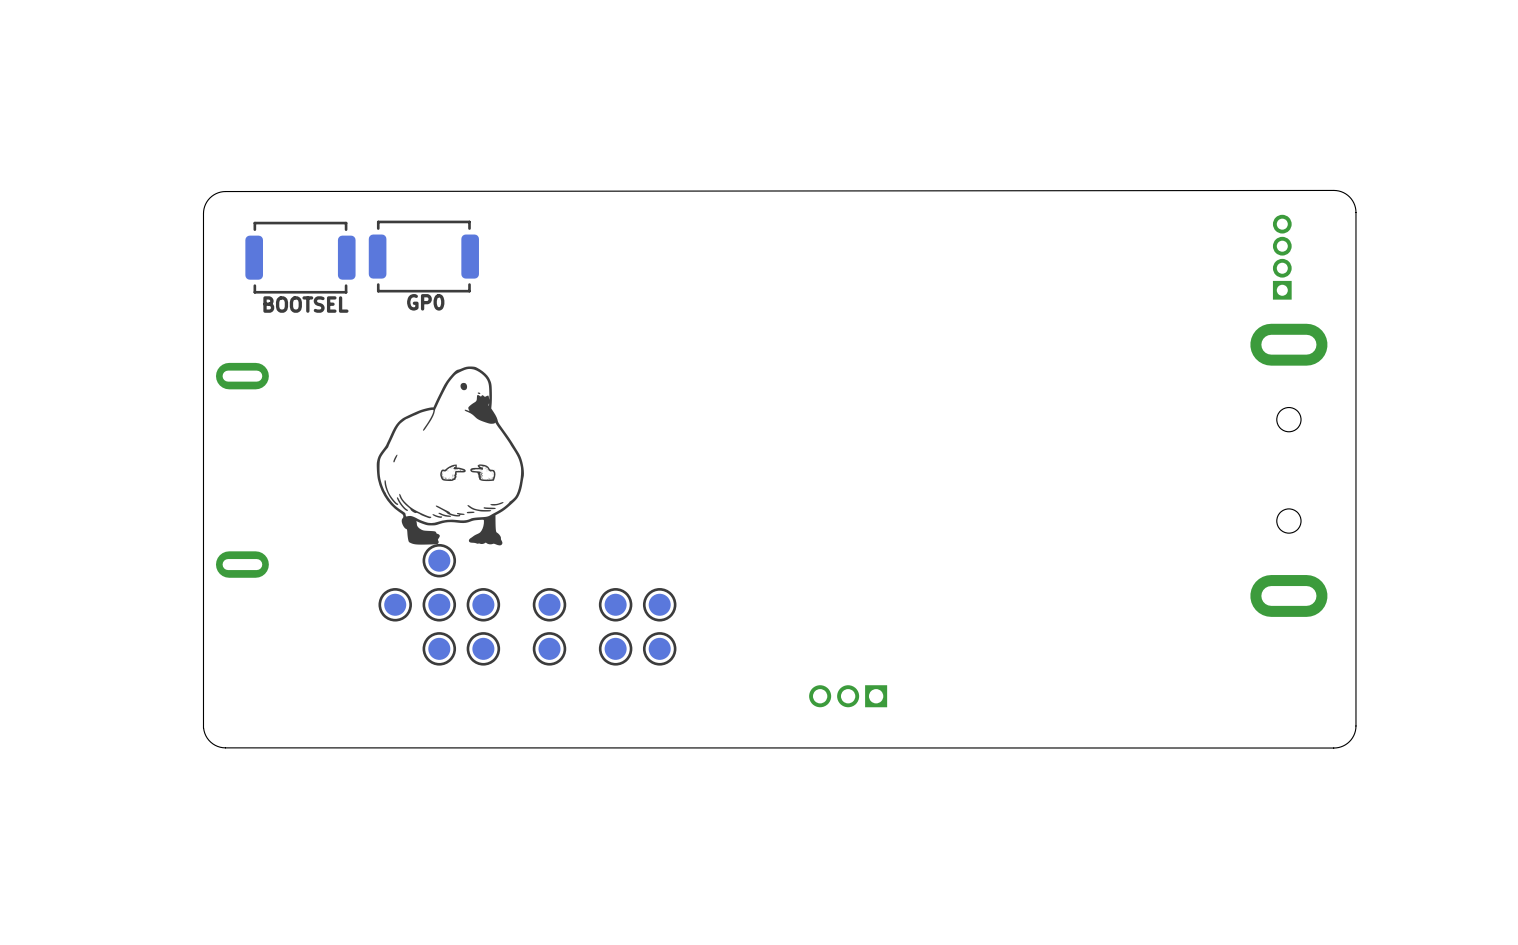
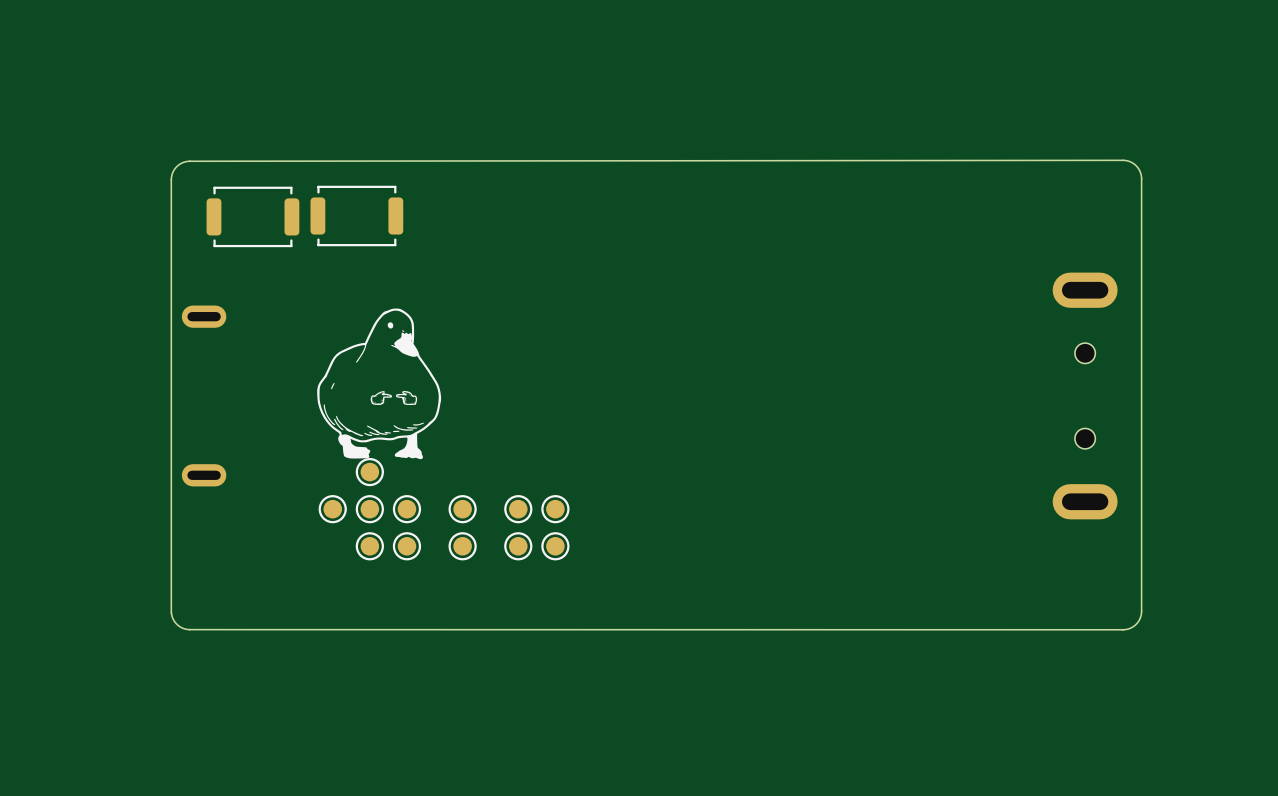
part: (1282, 257) -> none
text: GP0 (425, 302) -> none
text: BOOTSEL (305, 304) -> none
part: (848, 696) -> none

